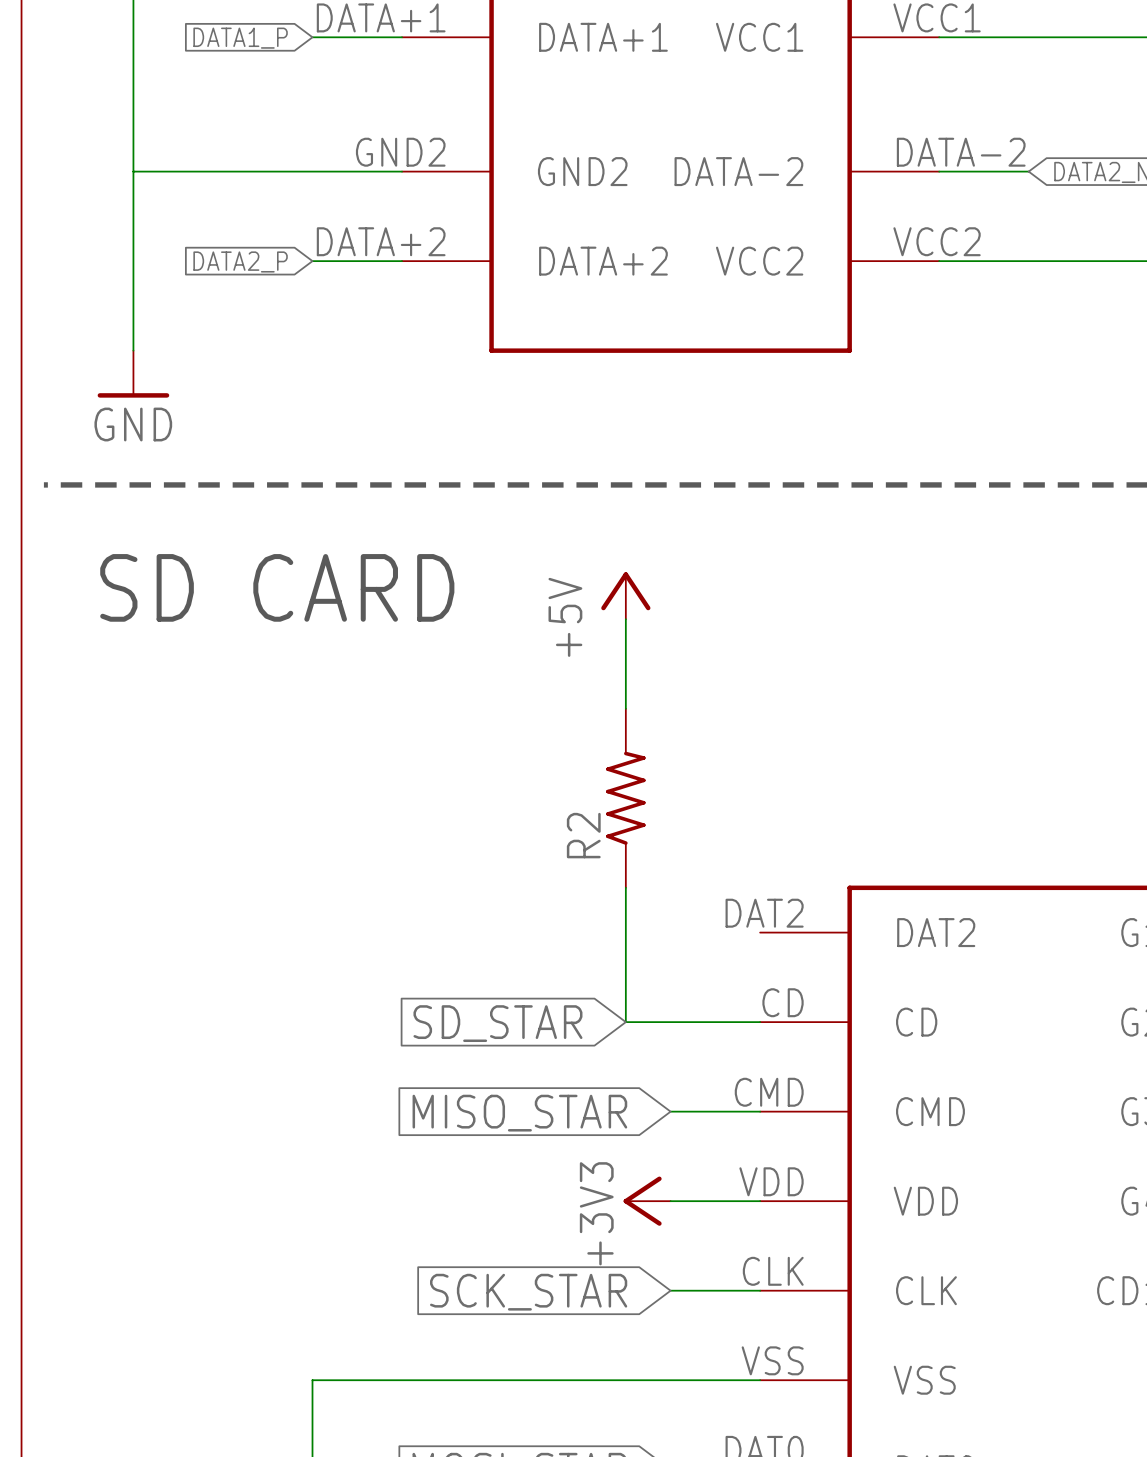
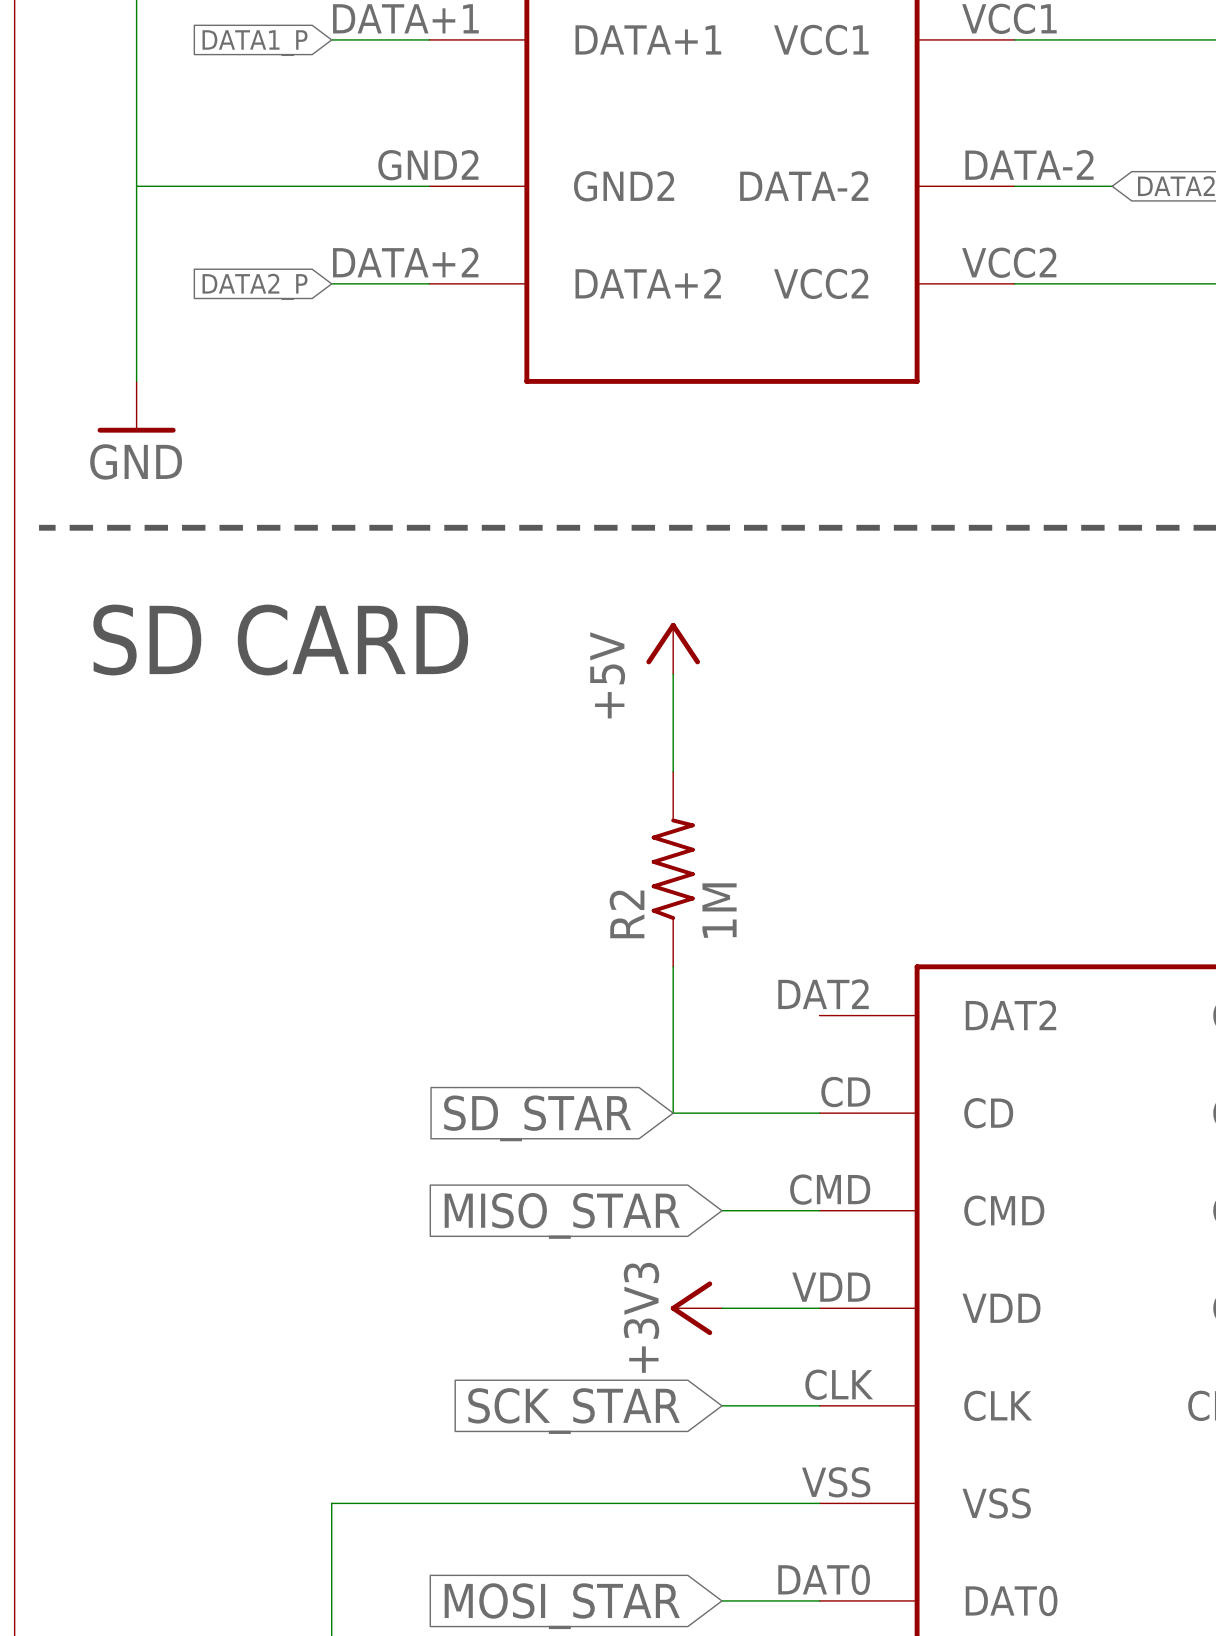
R2 value: none -> 1M (719, 910)

